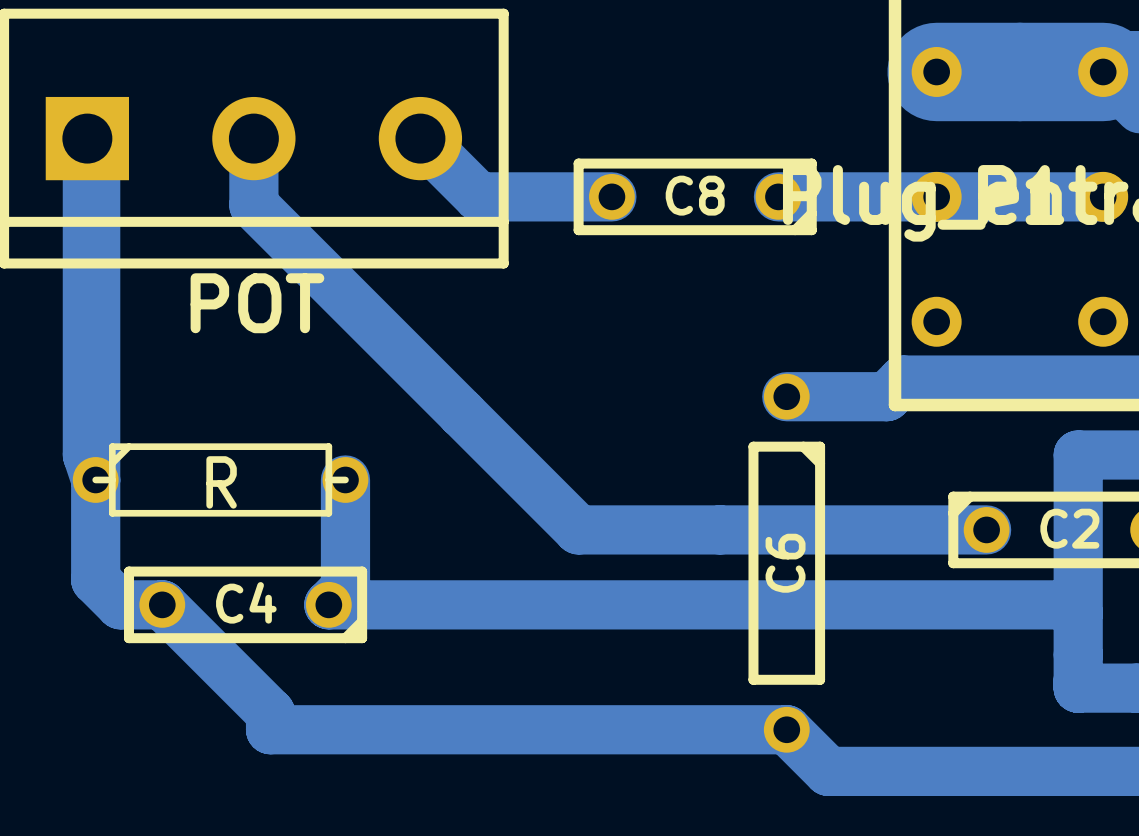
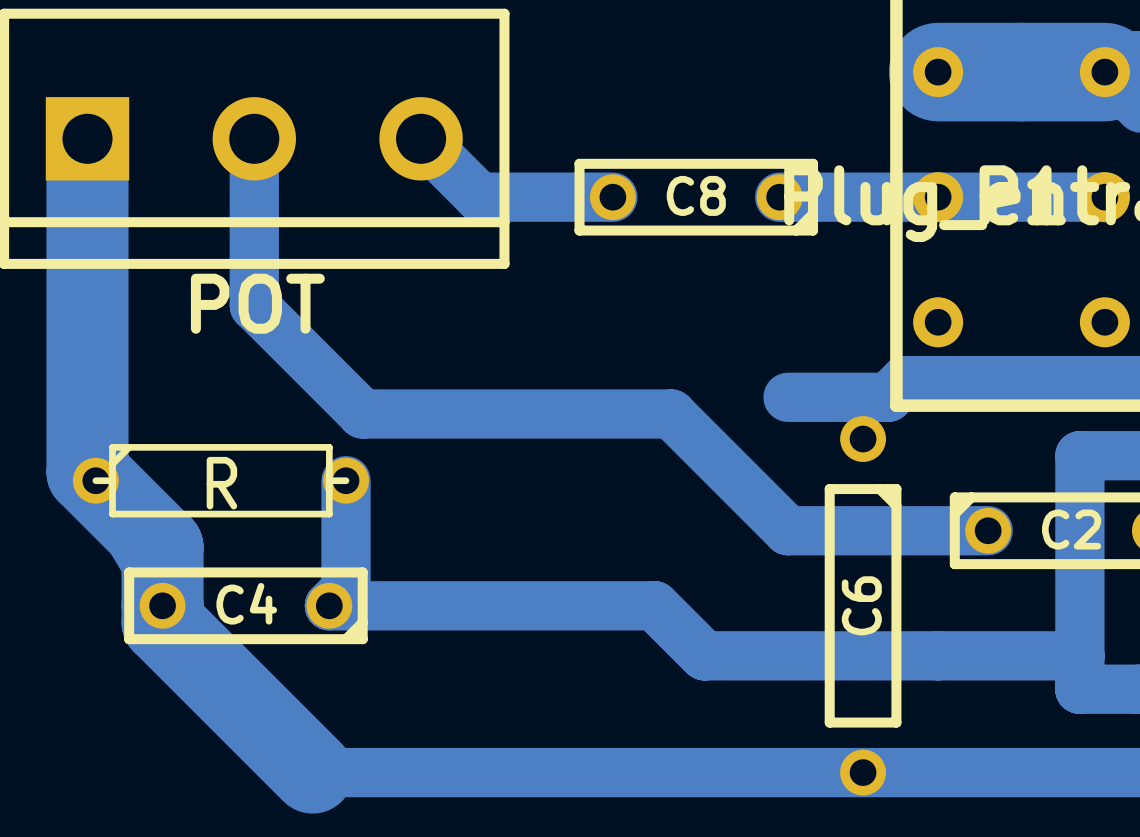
bottom track: (87, 138) (95, 146) (95, 579) (120, 604) (162, 604) (270, 713) (270, 729) (786, 729) (828, 771) -> (87, 138) (87, 472) (162, 547) (162, 622) (312, 772) (829, 772)
bottom track: (253, 205) (578, 529) (786, 529) -> (254, 205) (254, 305) (362, 414) (671, 414) (788, 530)
C6 position: (786, 563) -> (863, 605)
bottom track: (653, 604) (1069, 604) (1078, 613) -> (654, 605) (704, 655) (1079, 655)

